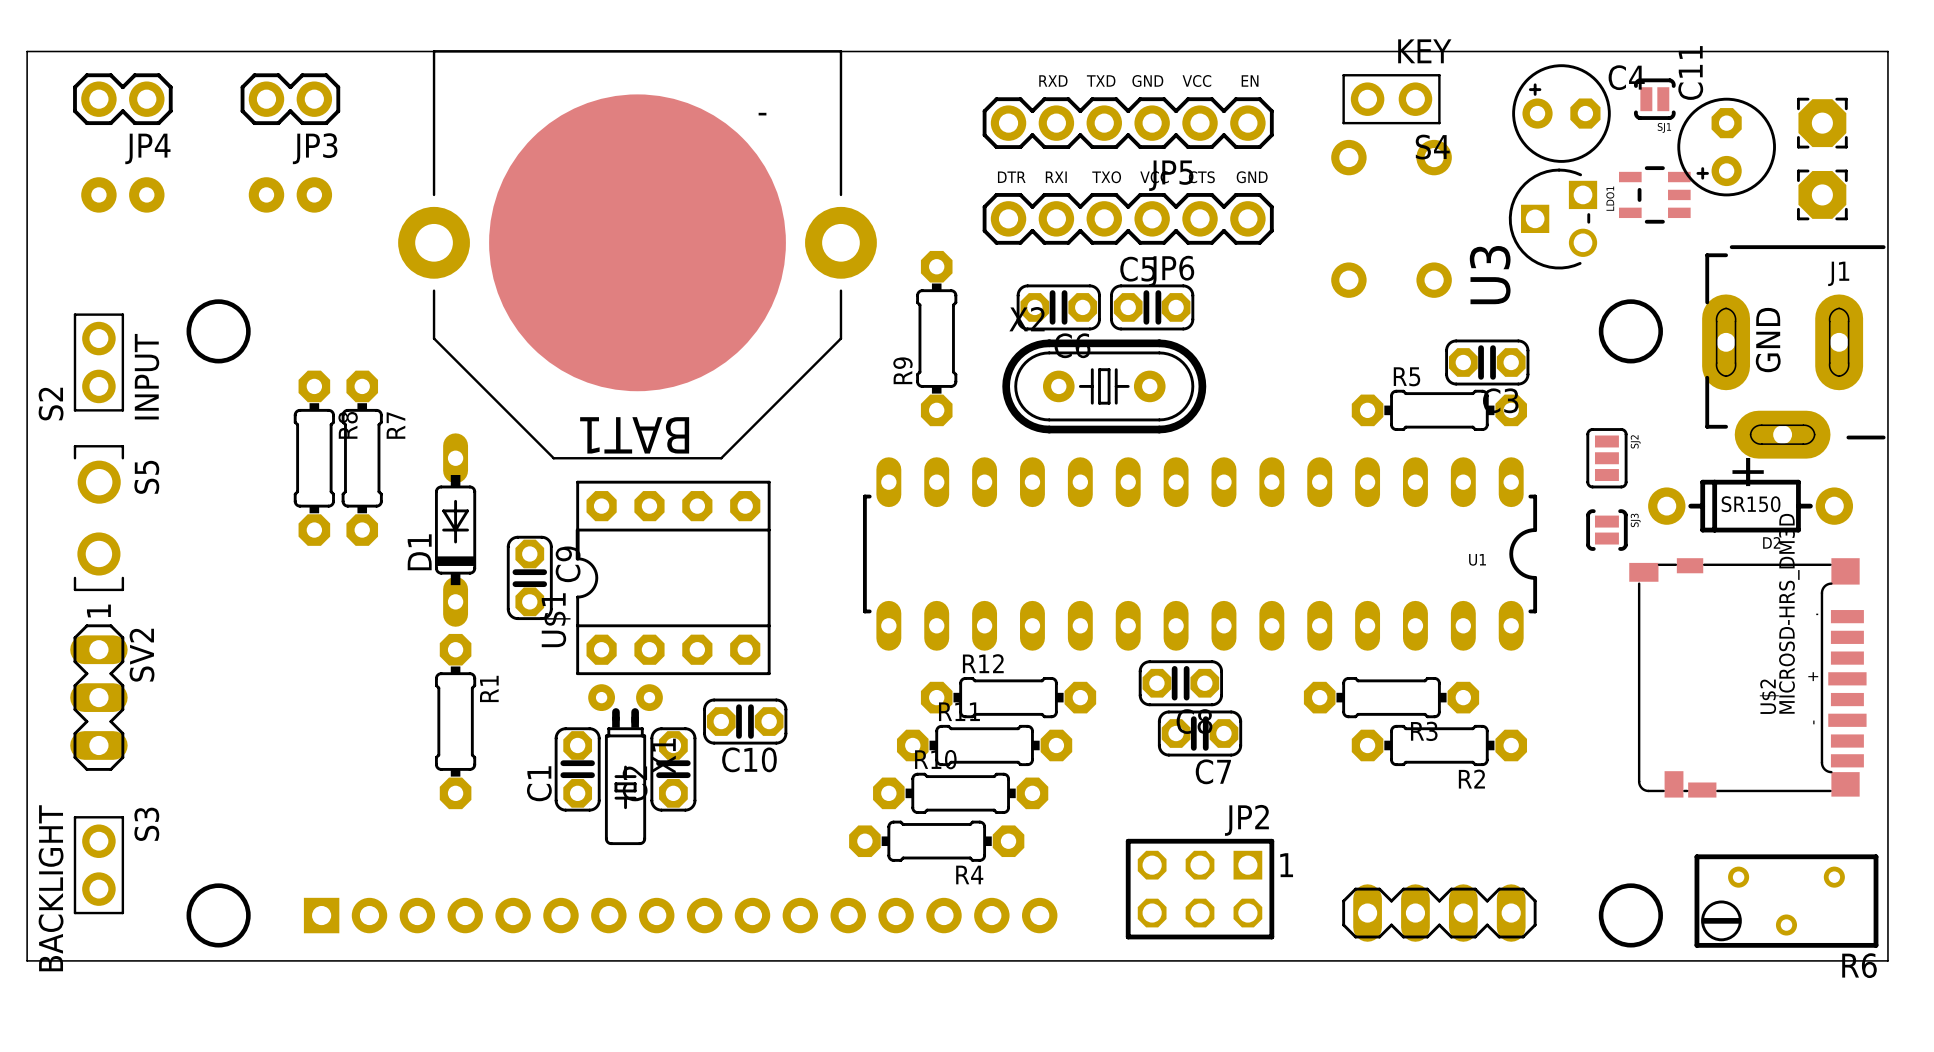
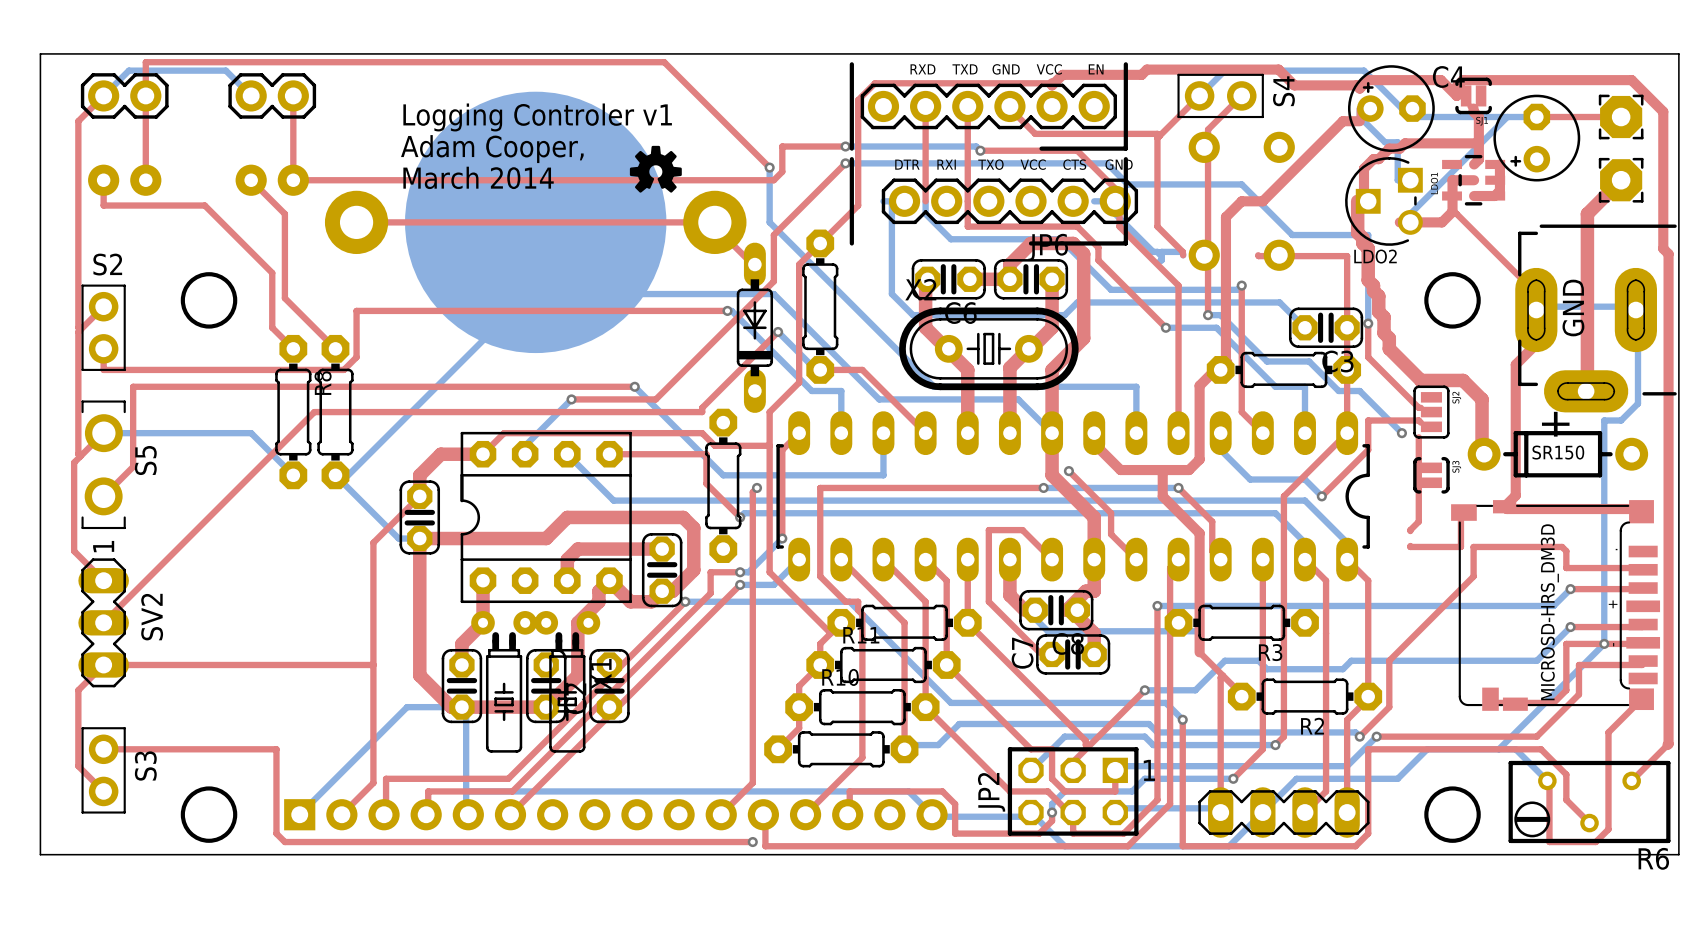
S4 value: KEY (1424, 51) -> none
line: none -> (851, 64) (851, 148)
line: none -> (1125, 64) (1125, 148) (1041, 148)
C11 name: C11 (1690, 73) -> none
top track: none -> (103, 95) (78, 121) (78, 327) (80, 329)
bottom track: none -> (103, 95) (128, 70) (225, 70) (251, 95)
top track: none -> (293, 95) (293, 180) (773, 180) (782, 171) (782, 146) (845, 146)
top track: none -> (1199, 95) (1157, 138) (1157, 226) (1182, 251) (1183, 255)
bottom track: none -> (1199, 95) (1224, 70) (1364, 70) (1410, 117) (1536, 117)
top track: none -> (1241, 95) (1208, 129) (1208, 315)
S4 position: (1391, 99) -> (1220, 95)
top track: none -> (925, 106) (925, 201)
top track: none -> (967, 106) (967, 226) (1077, 226) (1098, 247) (1098, 260) (1165, 327)
part: none -> (988, 106)
top track: none -> (1009, 106) (1035, 133) (1157, 133) (1159, 135)
top track: none -> (1470, 106) (1478, 117) (1478, 159) (1473, 163)
top track: none -> (1359, 108) (1359, 121) (1342, 121) (1262, 201) (1241, 201) (1225, 217) (1225, 364) (1220, 369)
bottom track: none -> (1359, 108) (1359, 117) (1385, 142) (1397, 142) (1397, 180) (1399, 180)
text: none -> Logging Controler v1 (537, 117)
JP5: (1128, 123) -> none
bottom track: none -> (1507, 117) (1399, 222)
top track: none -> (1536, 117) (1621, 117)
S4 name rotation: 0° (1432, 147) -> 90° counterclockwise (1283, 91)
JP4 name: JP4 (147, 148) -> none
JP3 name: JP3 (315, 148) -> none
top track: none -> (1478, 143) (1405, 143) (1399, 148) (1389, 148) (1378, 159) (1373, 159) (1364, 168) (1364, 201) (1357, 201) (1357, 232) (1368, 248) (1368, 280) (1378, 296) (1378, 311) (1384, 317) (1384, 333) (1389, 338) (1389, 348) (1420, 380) (1463, 380) (1482, 399) (1482, 454) (1484, 454)
drawing: none -> [629, 145, 682, 193]
bottom track: none -> (845, 146) (976, 146) (980, 150)
via: none -> (845, 146)
text: none -> Adam Cooper, (492, 149)
top track: none -> (980, 150) (1077, 150) (1119, 192) (1119, 226) (1178, 285) (1178, 433)
via: none -> (980, 150)
line: none -> (851, 159) (851, 243)
line: none -> (1125, 159) (1125, 243) (1031, 243)
top track: none -> (845, 163) (773, 235) (773, 281) (655, 399) (571, 399)
bottom track: none -> (845, 163) (1106, 163) (1127, 184) (1241, 184) (1292, 235) (1368, 235) (1368, 323)
via: none -> (845, 163)
top track: none -> (1499, 164) (1499, 190) (1494, 196) (1474, 196)
top track: none -> (769, 167) (664, 62) (145, 62) (145, 180)
bottom track: none -> (769, 167) (769, 222) (934, 386) (1136, 386) (1136, 433)
via: none -> (769, 167)
text: none -> March 2014 (478, 177)
top track: none -> (103, 180) (103, 205) (204, 205) (272, 272) (272, 327) (293, 348)
top track: none -> (251, 180) (284, 213) (284, 298) (335, 348)
top track: none -> (1474, 180) (1452, 180) (1452, 211)
top track: none -> (1621, 180) (1587, 213) (1586, 391)
bottom track: none -> (883, 201) (891, 201) (891, 294) (912, 315) (1064, 315) (1077, 302) (1279, 302) (1304, 327)
bottom track: none -> (925, 201) (925, 213) (950, 239) (1060, 239) (1111, 289) (1237, 289) (1241, 285)
bottom track: none -> (1094, 201) (1102, 201) (1153, 251) (1159, 253) (1161, 256) (1159, 261)
top track: none -> (1452, 211) (1532, 289) (1532, 306) (1536, 310) (1536, 343) (1515, 364) (1515, 495) (1504, 506)
top track: none -> (1452, 211) (1441, 222) (1399, 222)
top track: none -> (356, 222) (714, 222) (714, 226) (754, 264)
BAT1 side: top (637, 254) -> bottom (535, 222)
C5 name: C5 (1137, 269) -> none
J1 name: J1 (1838, 273) -> none
U3 name: U3 (1490, 275) -> LDO2 (1375, 256)
bottom track: none -> (1159, 253) (1161, 251) (1182, 251) (1183, 255)
top track: none -> (1258, 255) (1347, 256) (1347, 433) (1283, 496) (1283, 736) (1275, 745)
top track: none -> (927, 279) (925, 281) (925, 327) (967, 369) (967, 433)
top track: none -> (969, 279) (1009, 279) (1009, 264) (1031, 243) (1073, 243) (1083, 254) (1083, 338) (1052, 369) (1052, 475) (1094, 517) (1094, 591) (1085, 591) (1066, 610) (1071, 610) (1094, 633) (1094, 654)
top track: none -> (1052, 279) (1052, 327) (1009, 367) (1009, 433)
top track: none -> (1241, 285) (1241, 412) (1262, 433)
via: none -> (1241, 285)
top track: none -> (103, 306) (78, 331) (78, 454) (80, 456)
part: none -> (820, 306)
R9: (936, 338) -> none
bottom track: none -> (1536, 310) (1536, 306) (1633, 306) (1637, 310) (1637, 403) (1621, 420) (1604, 420) (1604, 643) (1498, 749)
top track: none -> (727, 310) (356, 310) (356, 357) (343, 369) (103, 369) (103, 348)
bottom track: none -> (727, 310) (731, 310) (811, 391) (841, 391) (841, 433)
via: none -> (727, 310)
bottom track: none -> (1208, 315) (1220, 315) (1267, 361) (1309, 361) (1338, 391) (1359, 391) (1401, 433)
via: none -> (1208, 315)
top track: none -> (1368, 323) (1368, 357) (1420, 407)
via: none -> (1368, 323)
part: none -> (754, 327)
bottom track: none -> (1165, 327) (1216, 327) (1275, 386) (1304, 386) (1304, 433)
via: none -> (1165, 327)
top track: none -> (778, 331) (702, 407) (702, 412) (314, 412) (103, 622)
bottom track: none -> (778, 331) (816, 369) (820, 369)
via: none -> (778, 331)
S2 value: INPUT (147, 376) -> none
R5 name: R5 (1406, 376) -> none
S2 name rotation: 0° (51, 404) -> 90° clockwise (107, 264)
S2 name position: S2 (51, 404) -> S2 (107, 264)
top track: none -> (820, 369) (862, 369) (925, 433)
top track: none -> (1220, 369) (1215, 369) (1199, 385) (1199, 459) (1189, 470) (1120, 470) (1099, 448) (1099, 438) (1094, 433)
R7 name: R7 (395, 425) -> none
top track: none -> (634, 386) (133, 386) (133, 466) (103, 496)
bottom track: none -> (634, 386) (723, 475) (883, 475) (883, 433)
via: none -> (634, 386)
bottom track: none -> (571, 399) (525, 445) (525, 454)
via: none -> (571, 399)
top track: none -> (1420, 422) (1418, 420) (1368, 420) (1368, 450) (1321, 496)
S5 name position: S5 (146, 477) -> S5 (145, 460)
top track: none -> (103, 433) (74, 462) (74, 551) (103, 580)
bottom track: none -> (103, 433) (251, 433) (293, 475)
top track: none -> (799, 433) (782, 450) (782, 538)
bottom track: none -> (1052, 433) (1018, 399) (879, 399) (773, 294) (609, 294) (535, 222) (567, 256) (343, 479) (335, 475) (398, 538) (419, 538)
bottom track: none -> (1220, 433) (1220, 450) (1250, 479) (1304, 479) (1321, 496)
via: none -> (1401, 433)
top track: none -> (1418, 437) (1418, 521) (1410, 531)
top track: none -> (769, 445) (714, 445) (702, 433) (504, 433) (483, 454) (440, 454) (419, 475) (419, 496) (373, 542) (373, 783) (341, 814)
bottom track: none -> (567, 454) (613, 500) (1304, 500) (1347, 542) (1347, 559)
top track: none -> (609, 454) (706, 454) (706, 483) (740, 517)
top track: none -> (1162, 470) (1162, 496) (1199, 533) (1199, 652)
top track: none -> (1068, 471) (1111, 513) (1111, 534) (1136, 559)
via: none -> (1068, 471)
D1: (455, 530) -> none
part: none -> (723, 485)
D2 name: D2 (1771, 542) -> none
top track: none -> (757, 487) (752, 492) (752, 783) (721, 814)
via: none -> (757, 487)
top track: none -> (1043, 487) (820, 487) (820, 576) (845, 601) (858, 601) (858, 610) (862, 614) (862, 757) (805, 814)
bottom track: none -> (1043, 487) (1178, 487)
via: none -> (1043, 487)
top track: none -> (1178, 487) (1212, 521) (1212, 551) (1220, 559)
via: none -> (1178, 487)
via: none -> (1321, 496)
U1 name: U1 (1477, 559) -> none
top track: none -> (1504, 506) (1506, 509) (1637, 509) (1641, 511)
top track: none -> (1463, 512) (1460, 513) (1460, 546) (1410, 546)
part: none -> (419, 517)
C9: (529, 577) -> none
part: none -> (546, 517)
top track: none -> (567, 517) (546, 538) (419, 538) (419, 675) (451, 707) (546, 707) (577, 675) (577, 622) (598, 601) (598, 591) (609, 580) (630, 601) (651, 601) (662, 591) (672, 591) (693, 570) (693, 527) (683, 517) (567, 517)
U$1: (673, 577) -> none
bottom track: none -> (740, 517) (744, 513) (1275, 513) (1304, 542) (1304, 559)
via: none -> (740, 517)
bottom track: none -> (782, 538) (748, 572) (740, 572)
via: none -> (782, 538)
top track: none -> (662, 549) (577, 549) (567, 559) (567, 580)
U$2 value position: MICROSD-HRS_DM3D (1789, 613) -> MICROSD-HRS_DM3D (1549, 612)
bottom track: none -> (799, 559) (773, 584) (740, 584)
top track: none -> (841, 559) (904, 622) (904, 749)
top track: none -> (883, 559) (925, 601) (925, 707) (1009, 791) (1047, 791) (1073, 816)
top track: none -> (925, 559) (946, 580) (946, 664) (1031, 749) (1052, 749) (1052, 778) (1064, 791) (1115, 791) (1115, 770)
top track: none -> (967, 559) (967, 622) (1085, 740) (1087, 747)
top track: none -> (1009, 559) (1009, 595) (1024, 610) (1031, 610)
top track: none -> (1052, 559) (1022, 530) (988, 530) (988, 601) (1039, 652) (1052, 652) (1052, 654)
top track: none -> (1178, 559) (1170, 568) (1170, 804) (1127, 846) (765, 846) (765, 816) (763, 814)
top track: none -> (1262, 559) (1262, 749) (1233, 778)
top track: none -> (1304, 559) (1326, 580) (1326, 791) (1304, 812)
top track: none -> (1347, 559) (1368, 580) (1368, 698) (1347, 719) (1347, 812)
part: none -> (662, 570)
top track: none -> (1643, 569) (1642, 568) (1566, 568) (1566, 551) (1562, 546) (1473, 546) (1473, 576) (1389, 660) (1389, 707) (1359, 736)
top track: none -> (740, 572) (710, 572) (710, 593) (512, 791) (428, 791) (428, 812) (426, 814)
via: none -> (740, 572)
top track: none -> (483, 580) (483, 622) (461, 643) (461, 664)
top track: none -> (740, 584) (510, 814)
via: none -> (740, 584)
SV2 name position: SV2 (142, 655) -> SV2 (152, 617)
top track: none -> (1643, 588) (1570, 589)
bottom track: none -> (1570, 589) (1553, 605) (1157, 605)
via: none -> (1570, 589)
R12 name: R12 (983, 663) -> none
top track: none -> (685, 601) (508, 778) (386, 778) (386, 812) (384, 814)
bottom track: none -> (685, 601) (849, 601) (950, 702) (1165, 702) (1182, 719)
via: none -> (685, 601)
top track: none -> (1157, 605) (1157, 799) (1123, 833) (1073, 833) (1073, 812)
via: none -> (1157, 605)
bottom track: none -> (1024, 610) (1047, 631) (1199, 631) (1199, 633)
U$2 name: U$2 (1769, 696) -> none
top track: none -> (841, 622) (820, 643) (820, 664) (799, 686) (799, 728) (778, 749)
top track: none -> (1643, 624) (1642, 627) (1570, 627)
bottom track: none -> (1570, 627) (1536, 660) (1351, 660) (1342, 669) (1267, 669) (1258, 660) (1224, 660) (1195, 690) (1144, 690)
via: none -> (1570, 627)
top track: none -> (830, 633) (769, 572) (769, 412) (799, 382) (799, 264) (858, 205) (858, 100) (875, 83) (1052, 83) (1052, 85) (1062, 74) (1141, 74) (1146, 69) (1278, 69) (1294, 85) (1356, 85) (1359, 88) (1368, 80) (1440, 80) (1456, 95) (1456, 86) (1463, 80) (1631, 80) (1663, 111) (1663, 248) (1668, 254) (1668, 744) (1631, 780)
top track: none -> (1643, 642) (1566, 643) (1566, 690) (1553, 702) (1515, 704) (1494, 702) (1490, 699)
R1: (455, 721) -> none
C10: (745, 721) -> none
via: none -> (1604, 643)
top track: none -> (1199, 652) (1241, 696)
top track: none -> (1643, 661) (1642, 664) (1578, 664) (1578, 694) (1536, 736) (1376, 736)
top track: none -> (373, 664) (103, 664) (78, 690) (78, 766) (103, 791)
R2 position: (1439, 745) -> (1304, 696)
top track: none -> (1222, 675) (1220, 677) (1220, 812)
part: none -> (504, 681)
part: none -> (461, 686)
C1: (577, 769) -> none
part: none -> (546, 686)
C7 name rotation: 0° (1213, 771) -> 90° counterclockwise (1022, 653)
C7 name position: C7 (1213, 771) -> C7 (1022, 653)
top track: none -> (1144, 690) (1073, 761) (1073, 770)
via: none -> (1144, 690)
R2 name position: R2 (1471, 779) -> R2 (1312, 726)
top track: none -> (1641, 699) (1608, 732) (1608, 829) (1595, 842) (1549, 842) (1549, 783) (1547, 780)
top track: none -> (1182, 719) (1182, 846) (1355, 846) (1368, 833) (1368, 749) (1541, 749) (1566, 774) (1566, 799) (1589, 823)
via: none -> (1182, 719)
JP2 name rotation: 0° (1246, 820) -> 90° counterclockwise (991, 792)
JP2 name position: JP2 (1246, 820) -> JP2 (991, 792)
S3 name position: S3 (146, 824) -> S3 (145, 766)
bottom track: none -> (1359, 736) (1355, 732) (1157, 732) (1149, 724) (959, 724) (938, 745) (908, 745) (904, 749)
via: none -> (1359, 736)
bottom track: none -> (1376, 736) (1347, 766) (1119, 766) (1115, 770)
via: none -> (1376, 736)
bottom track: none -> (1275, 745) (1153, 745) (1144, 736) (1064, 736) (1031, 770)
via: none -> (1275, 745)
top track: none -> (103, 749) (276, 749) (276, 833) (284, 842) (752, 842)
R4 name: R4 (969, 874) -> none
bottom track: none -> (1233, 778) (1144, 778) (1132, 791) (1064, 791) (1052, 804) (1052, 812)
via: none -> (1233, 778)
bottom track: none -> (1547, 780) (1515, 749) (1427, 749) (1397, 778) (1296, 778) (1229, 846) (1064, 846) (1031, 812) (1031, 816) (934, 816) (908, 791) (466, 791)
S3 value: BACKLIGHT (51, 888) -> none
top track: none -> (1052, 812) (1052, 820) (1039, 833) (955, 833) (955, 804) (942, 791) (849, 791) (849, 812) (847, 814)
via: none -> (1052, 812)
bottom track: none -> (1115, 812) (1119, 808) (1216, 808) (1220, 812)
bottom track: none -> (299, 814) (407, 707) (466, 707) (466, 812) (468, 814)
via: none -> (752, 842)

